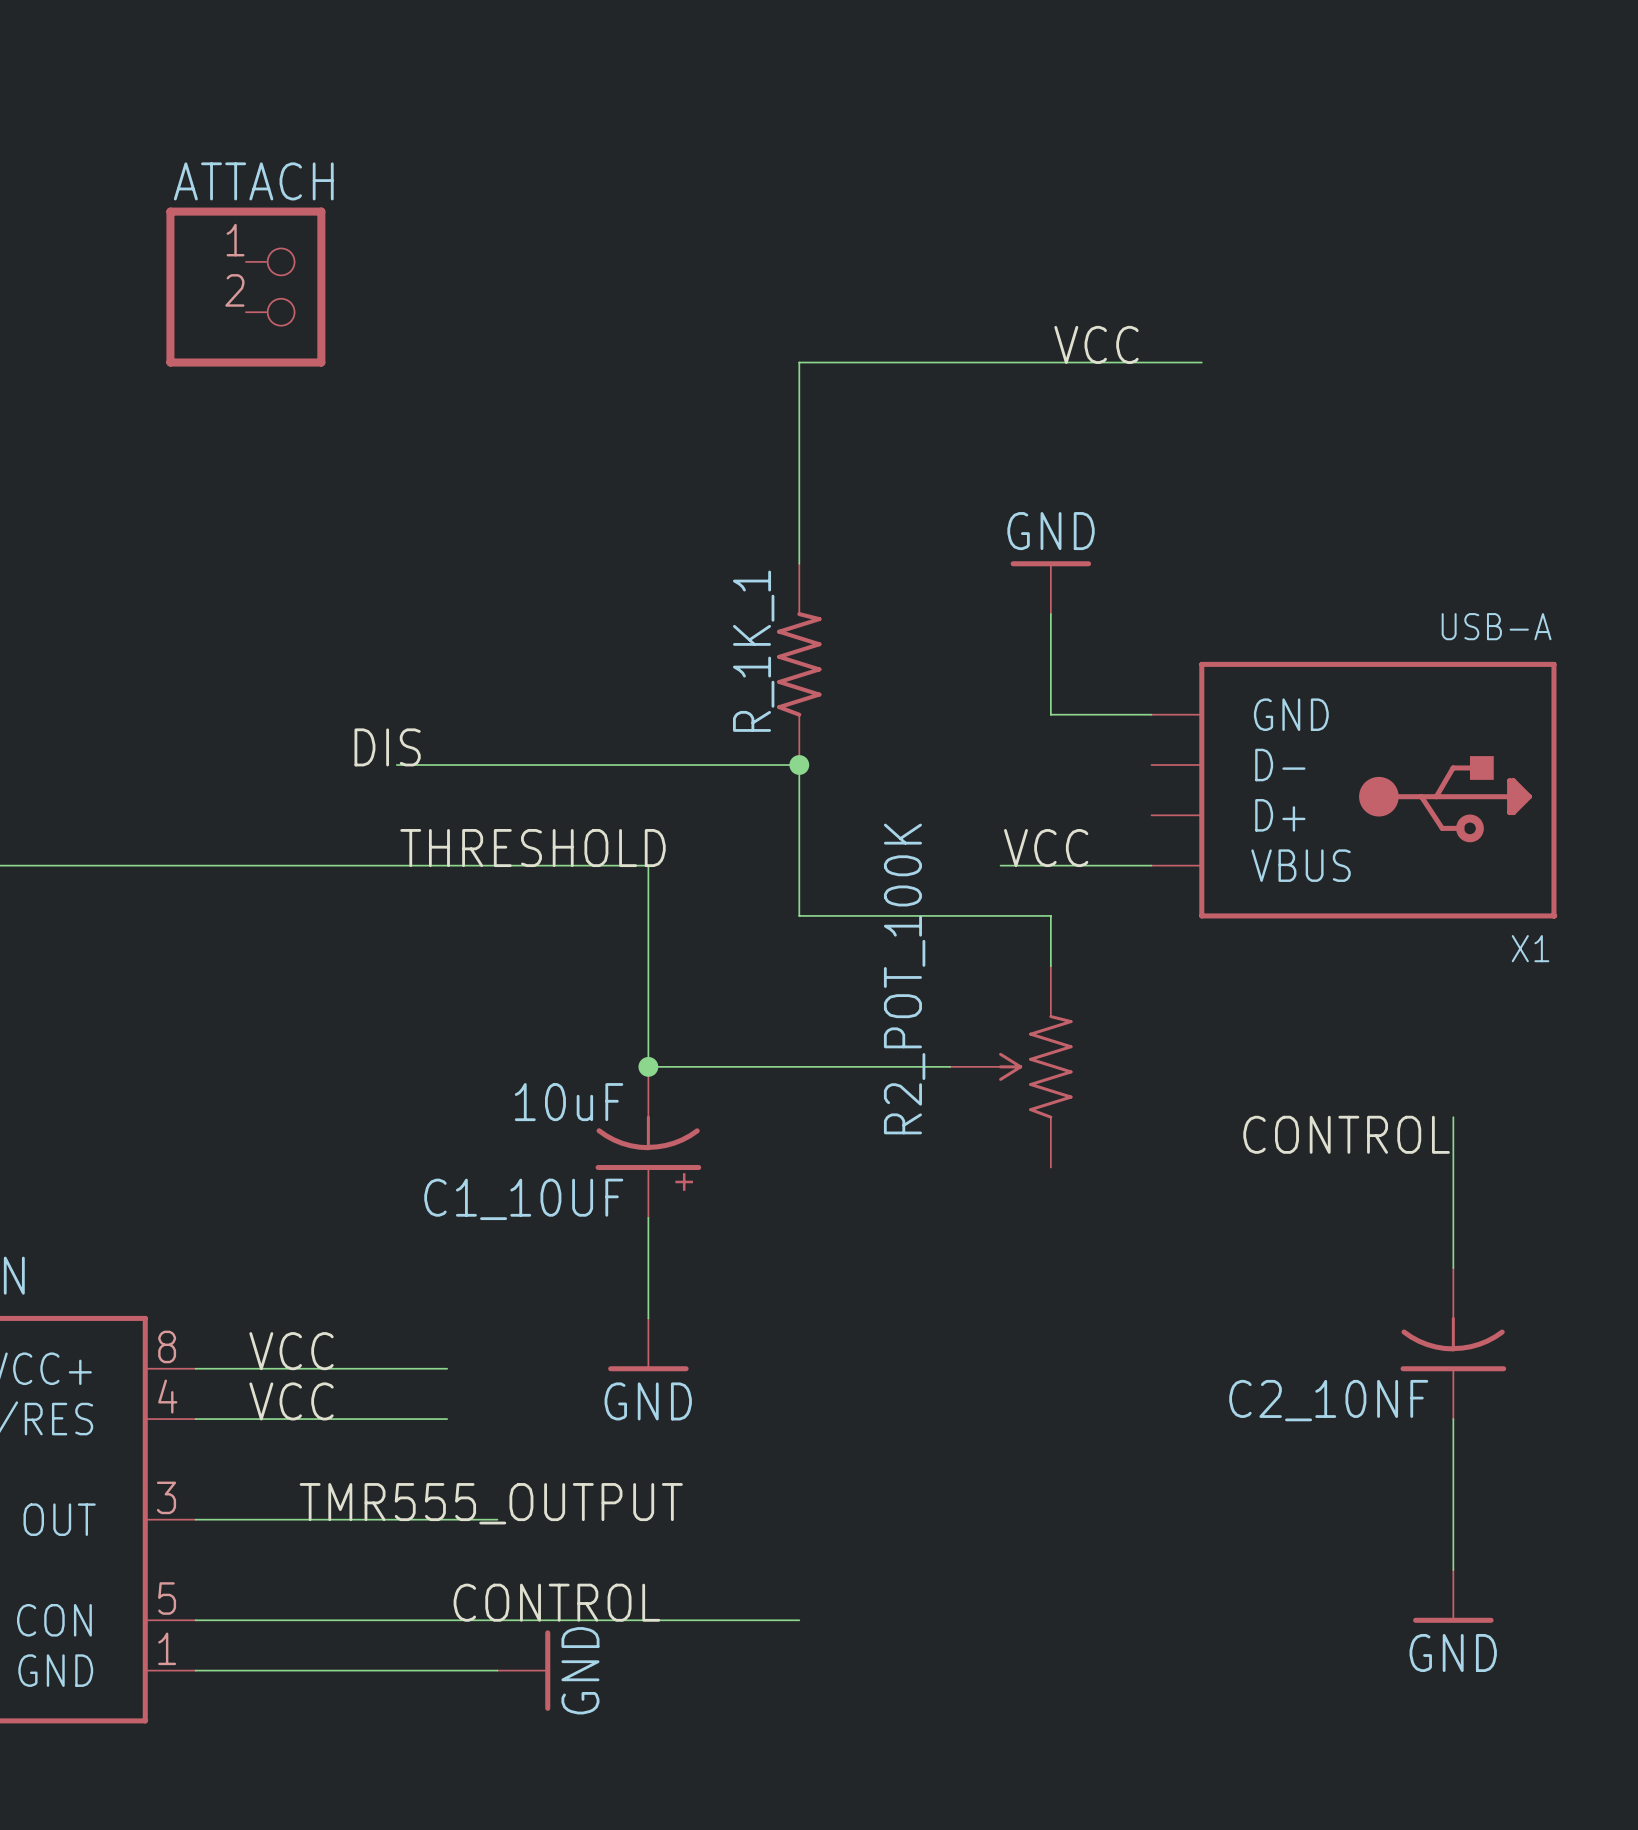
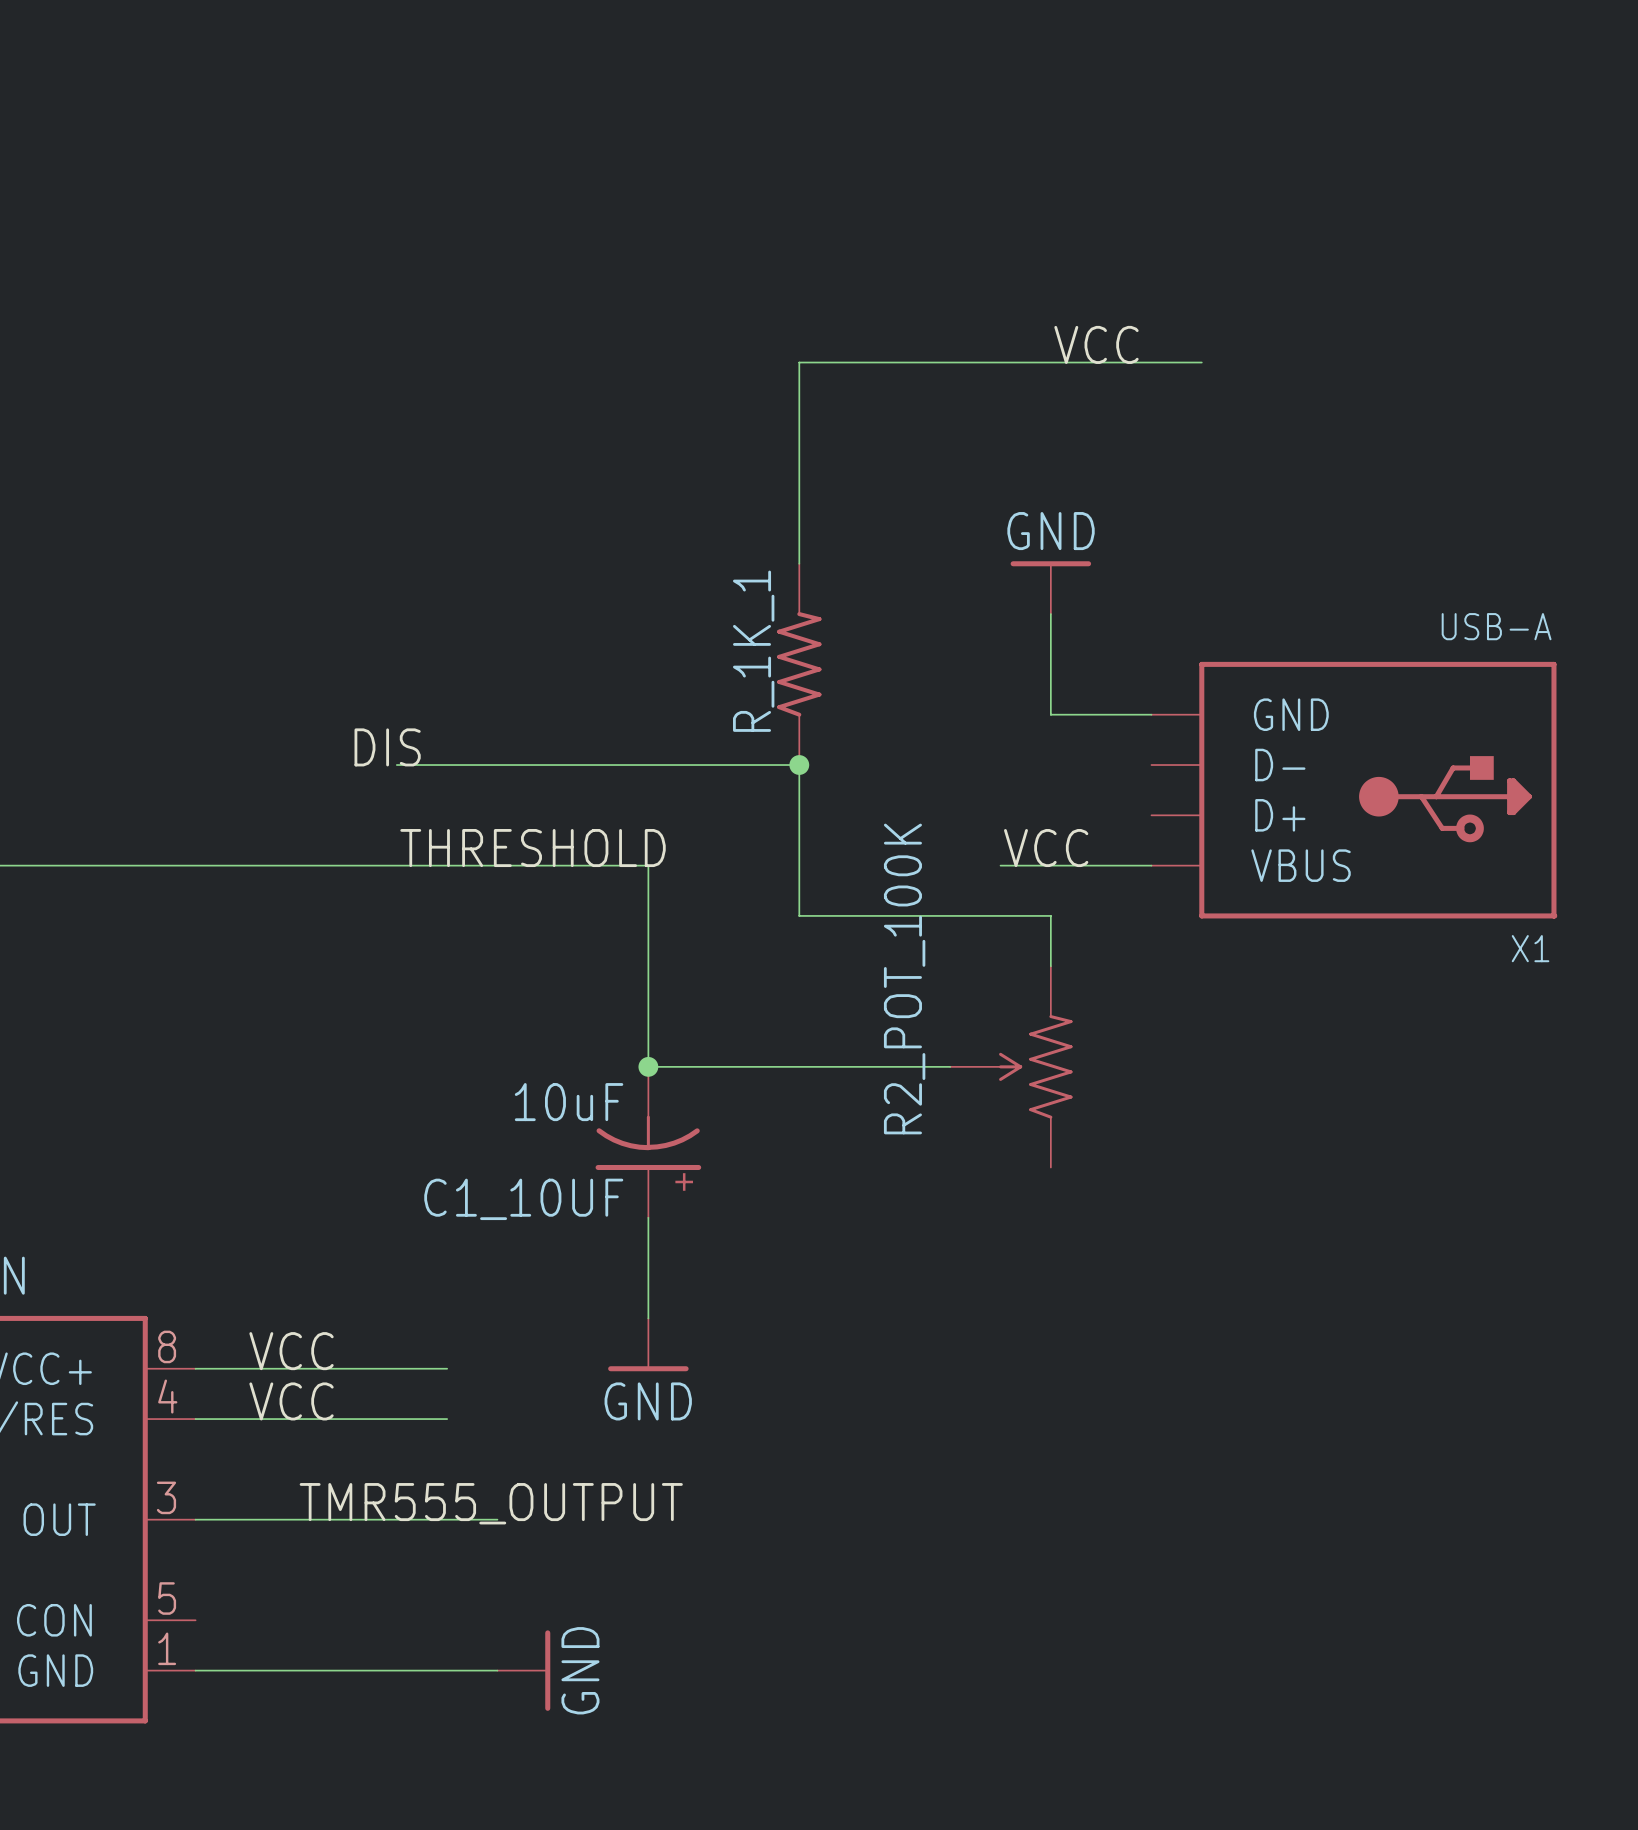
ATTACH: (245, 287) -> none
wire: (1453, 1117) (1453, 1268) -> none
label: CONTROL (1346, 1134) -> none
C2_10NF: (1453, 1343) -> none
wire: (1453, 1419) (1453, 1569) -> none
power symbol: GND (1453, 1596) -> none
label: CONTROL (556, 1602) -> none
wire: (195, 1620) (799, 1620) -> none

